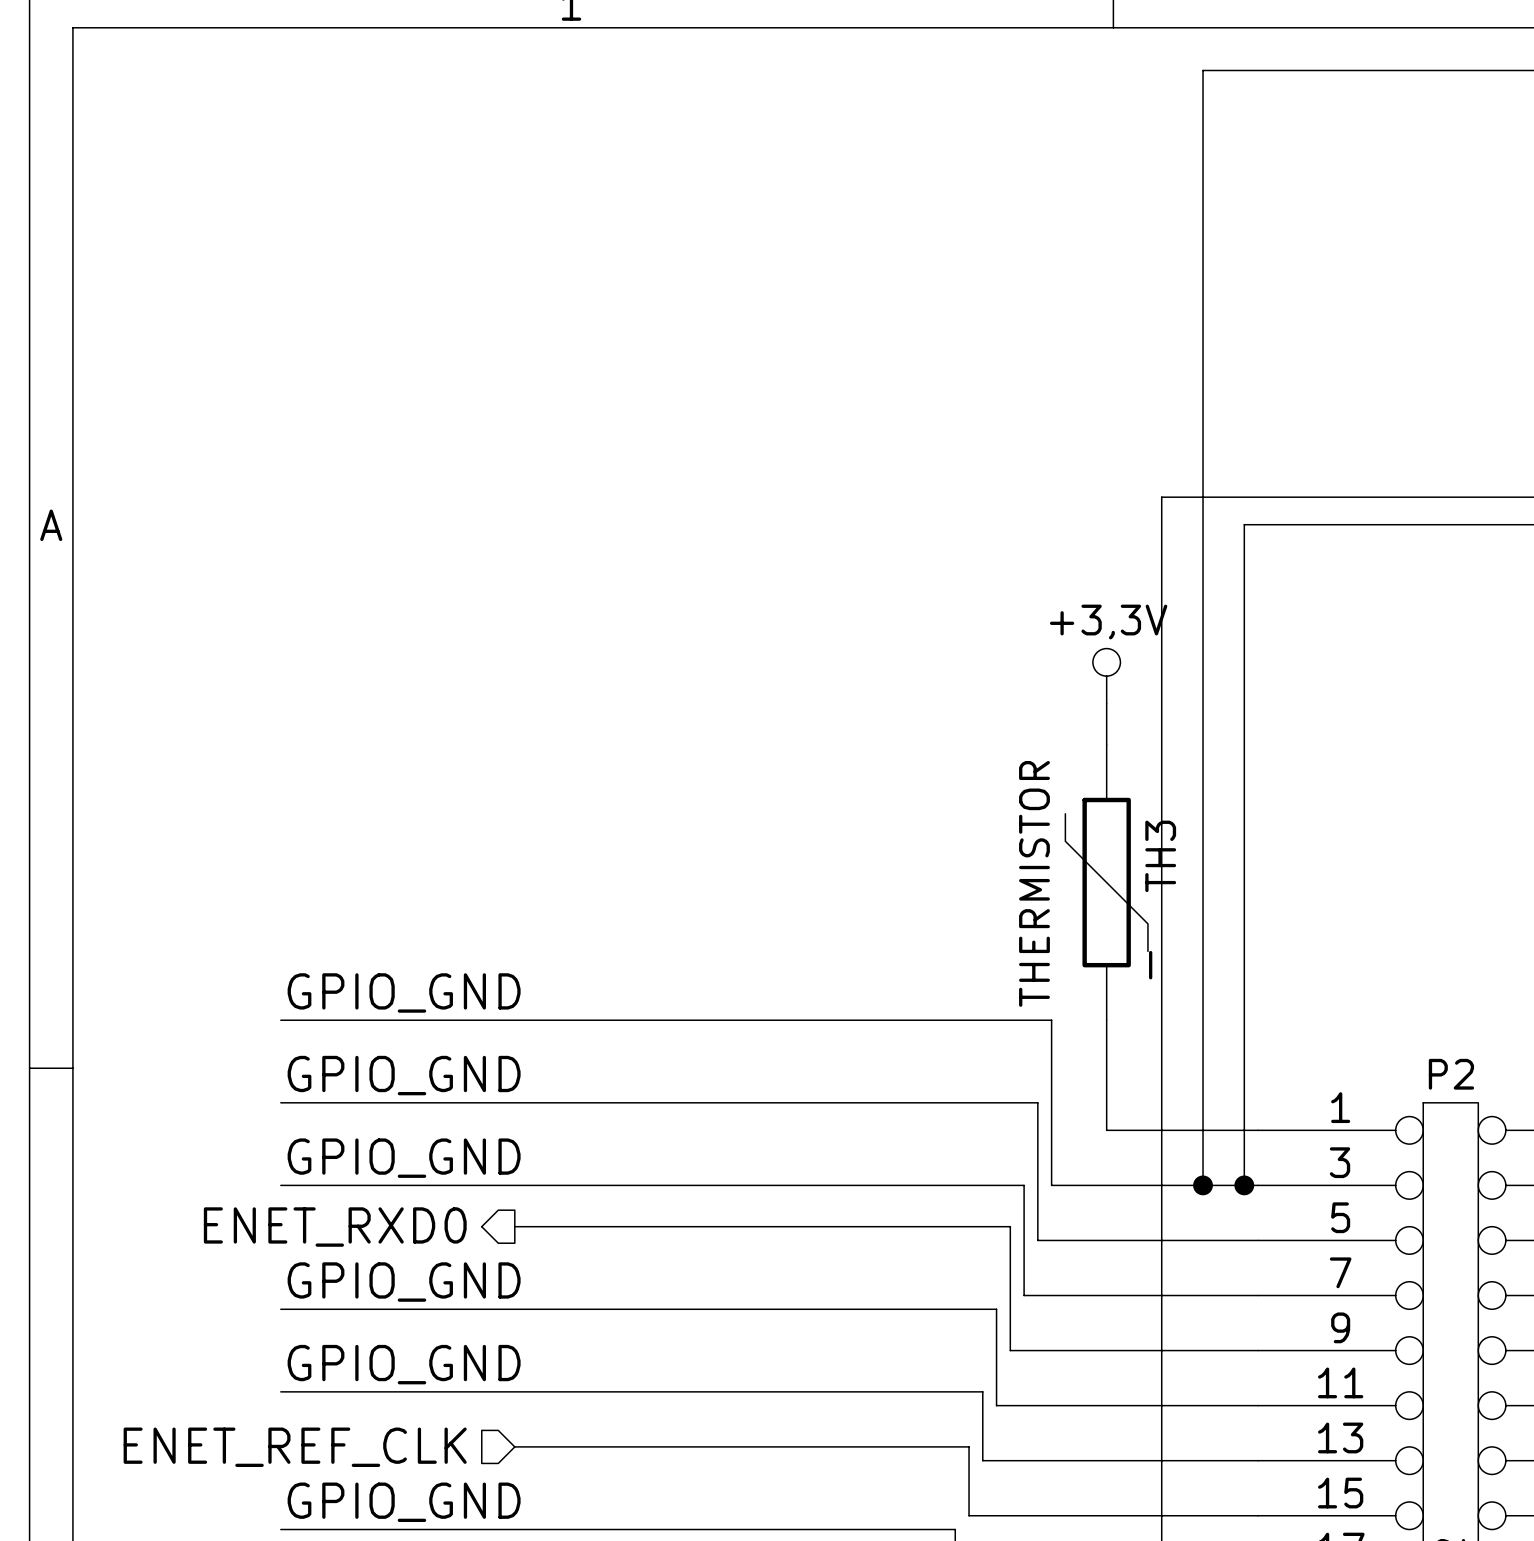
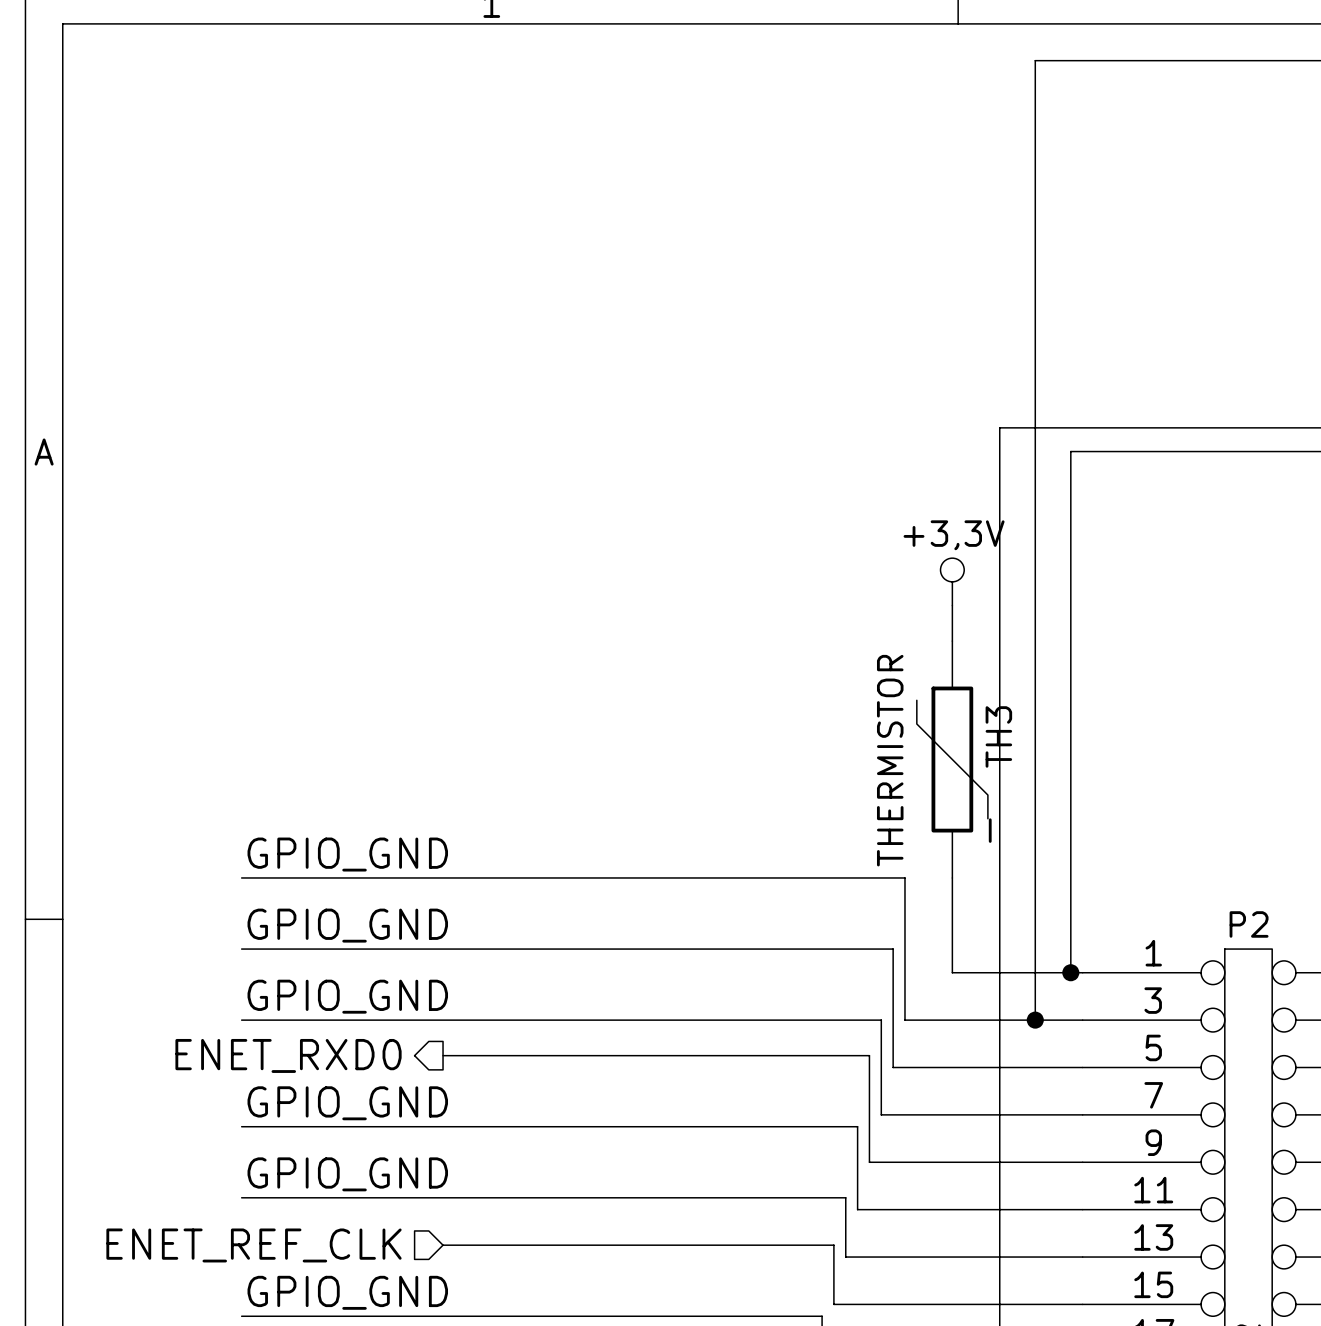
wire: (1244, 1130) (1244, 1185) -> none
junction position: (1244, 1185) -> (1070, 972)

